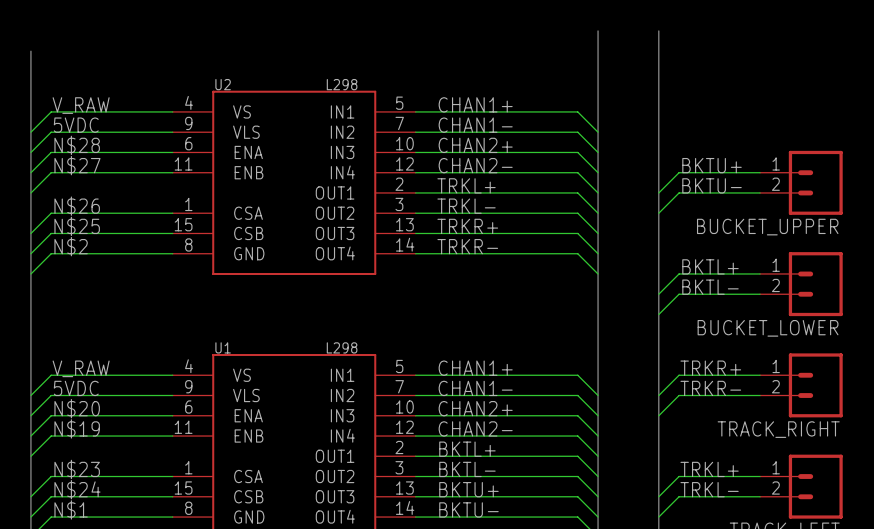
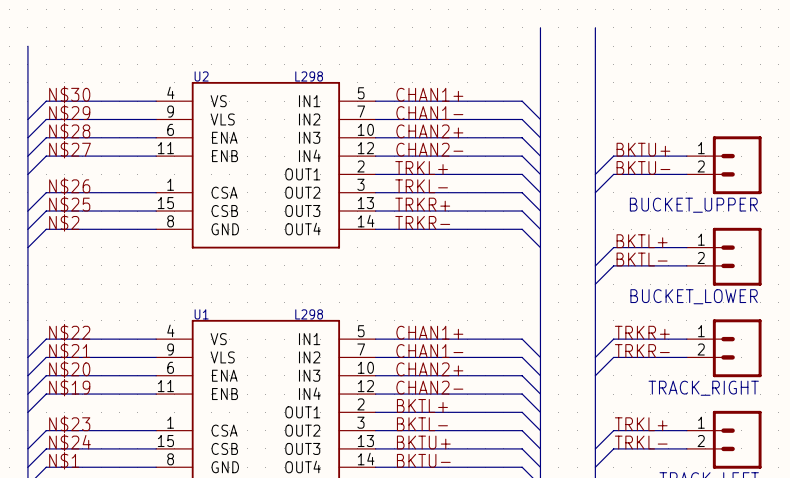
label: V_RAW (81, 105) -> N$30 (69, 94)
label: 5VDC (76, 125) -> N$29 (69, 113)
label: V_RAW (81, 368) -> N$22 (69, 332)
label: 5VDC (76, 388) -> N$21 (69, 351)

